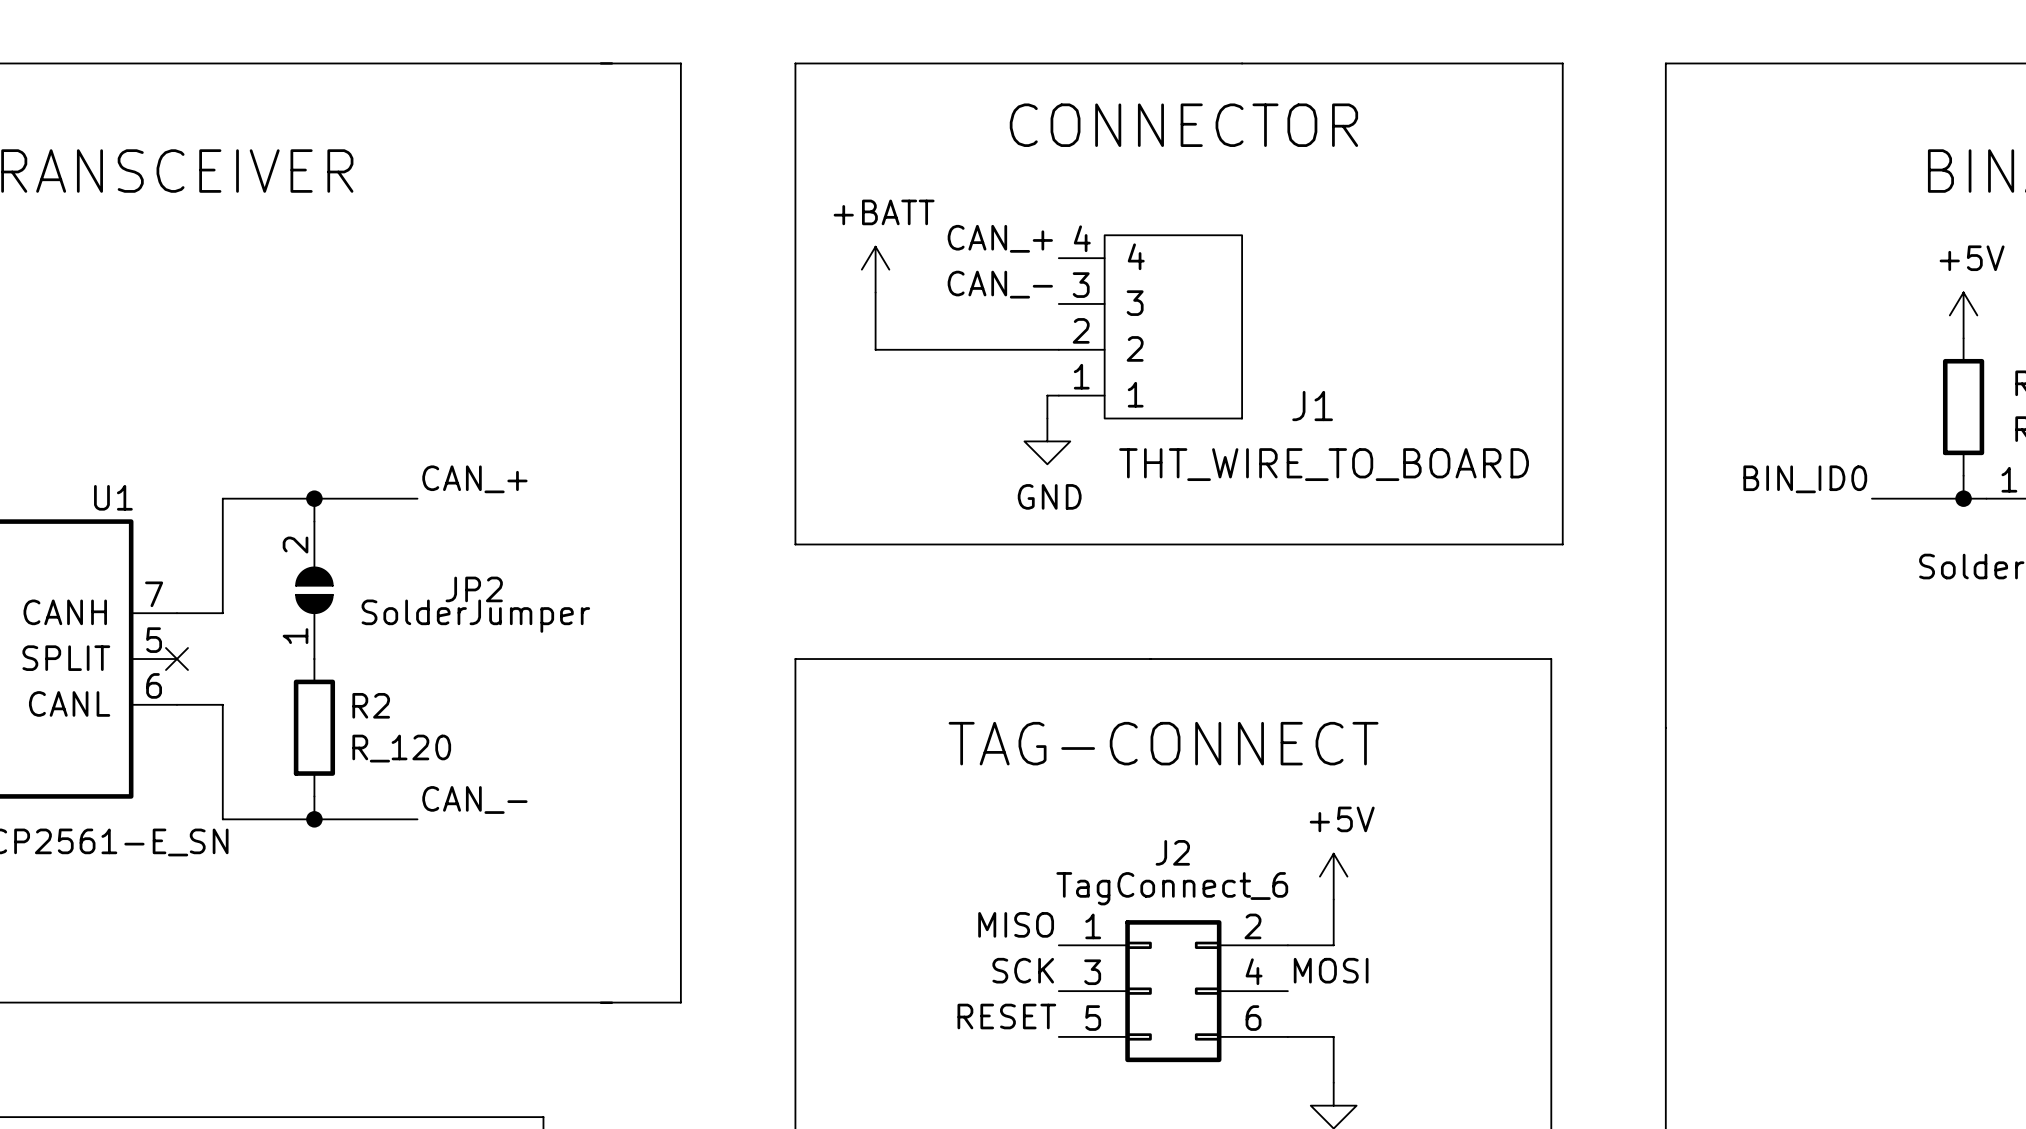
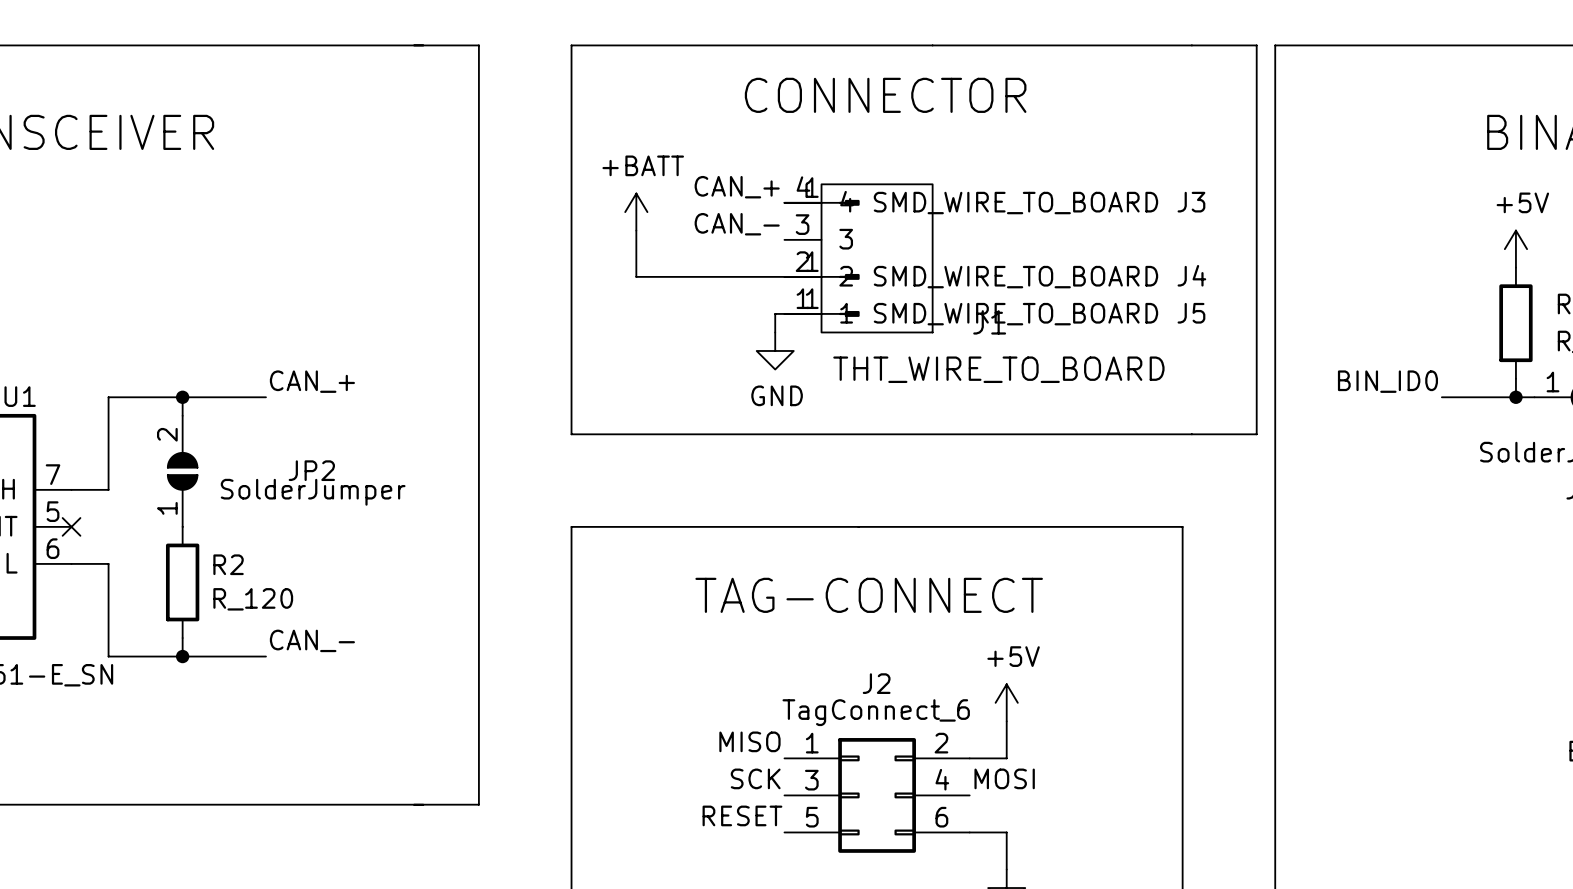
line: (1562, 63) (1562, 544) -> (1191, 45) (1256, 45) (1256, 434) (1191, 434)
J3: none -> SMD_WIRE_TO_BOARD (822, 202)
J4: none -> SMD_WIRE_TO_BOARD (822, 276)
J5: none -> SMD_WIRE_TO_BOARD (822, 313)

